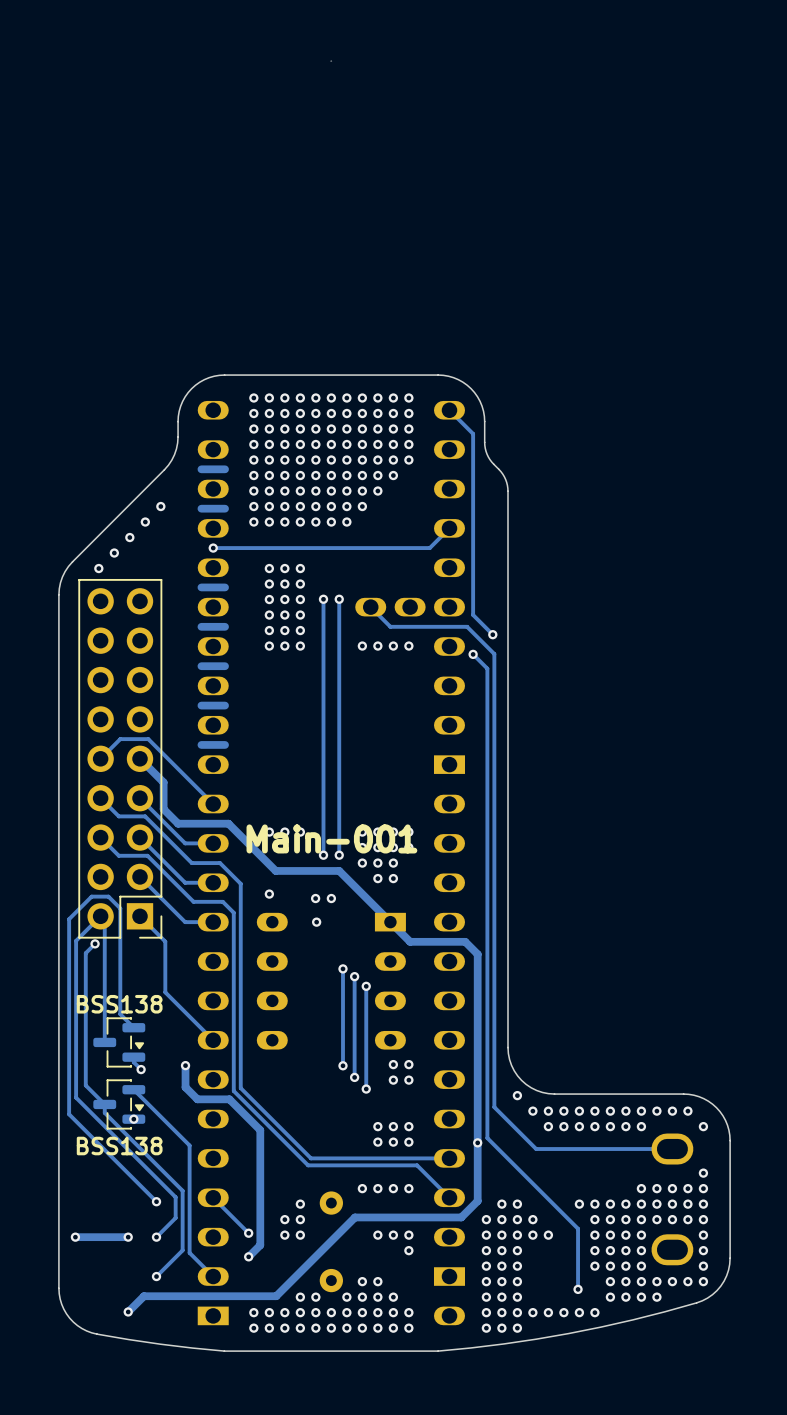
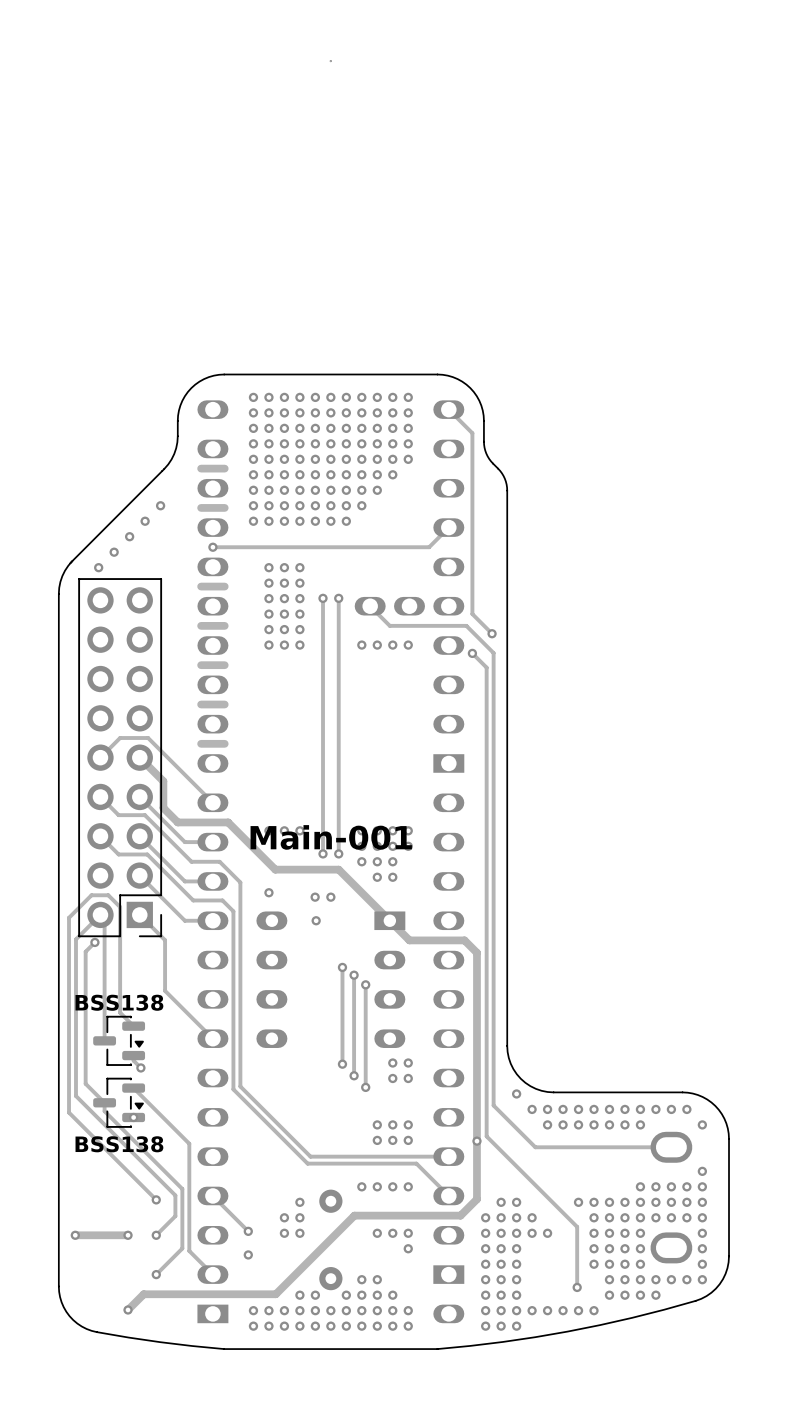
track: (185, 1065) (185, 1087) (197, 1099) (229, 1099) (260, 1130) (260, 1245) (248, 1256) -> none
via: (185, 1065) -> none

